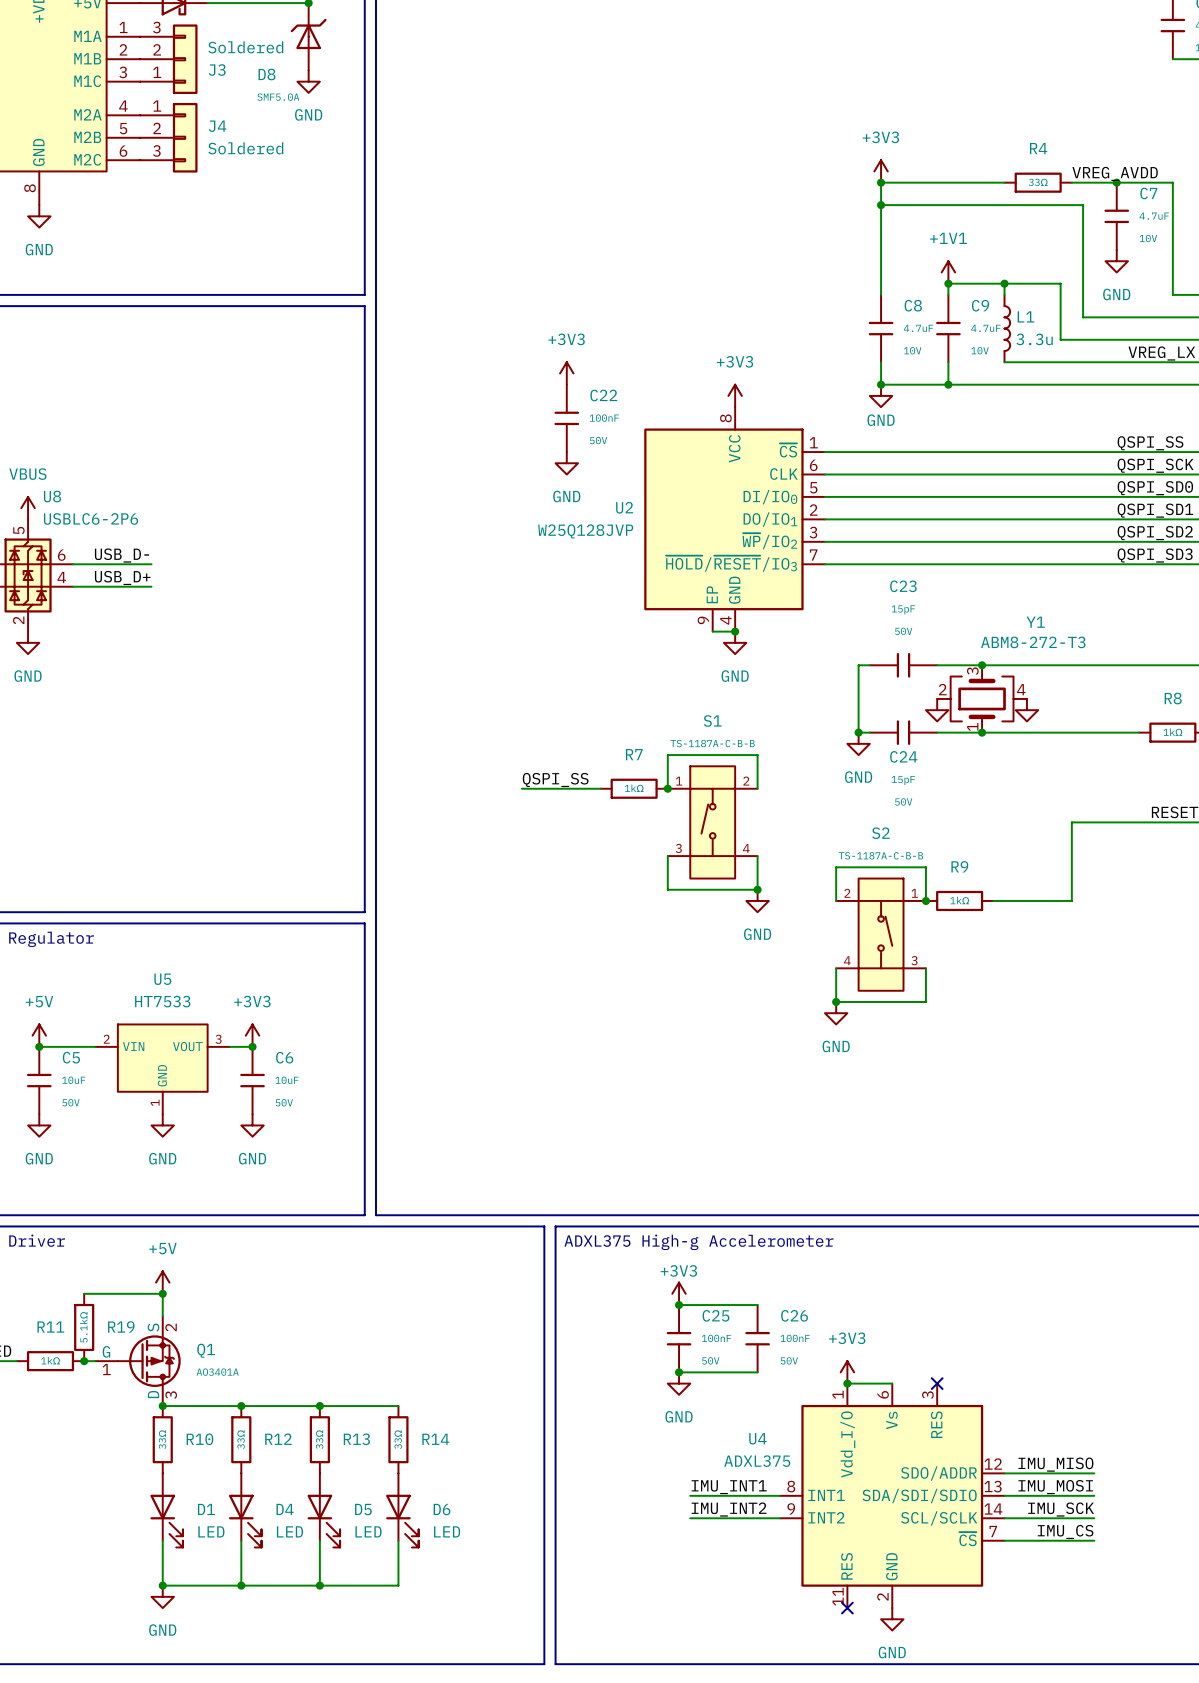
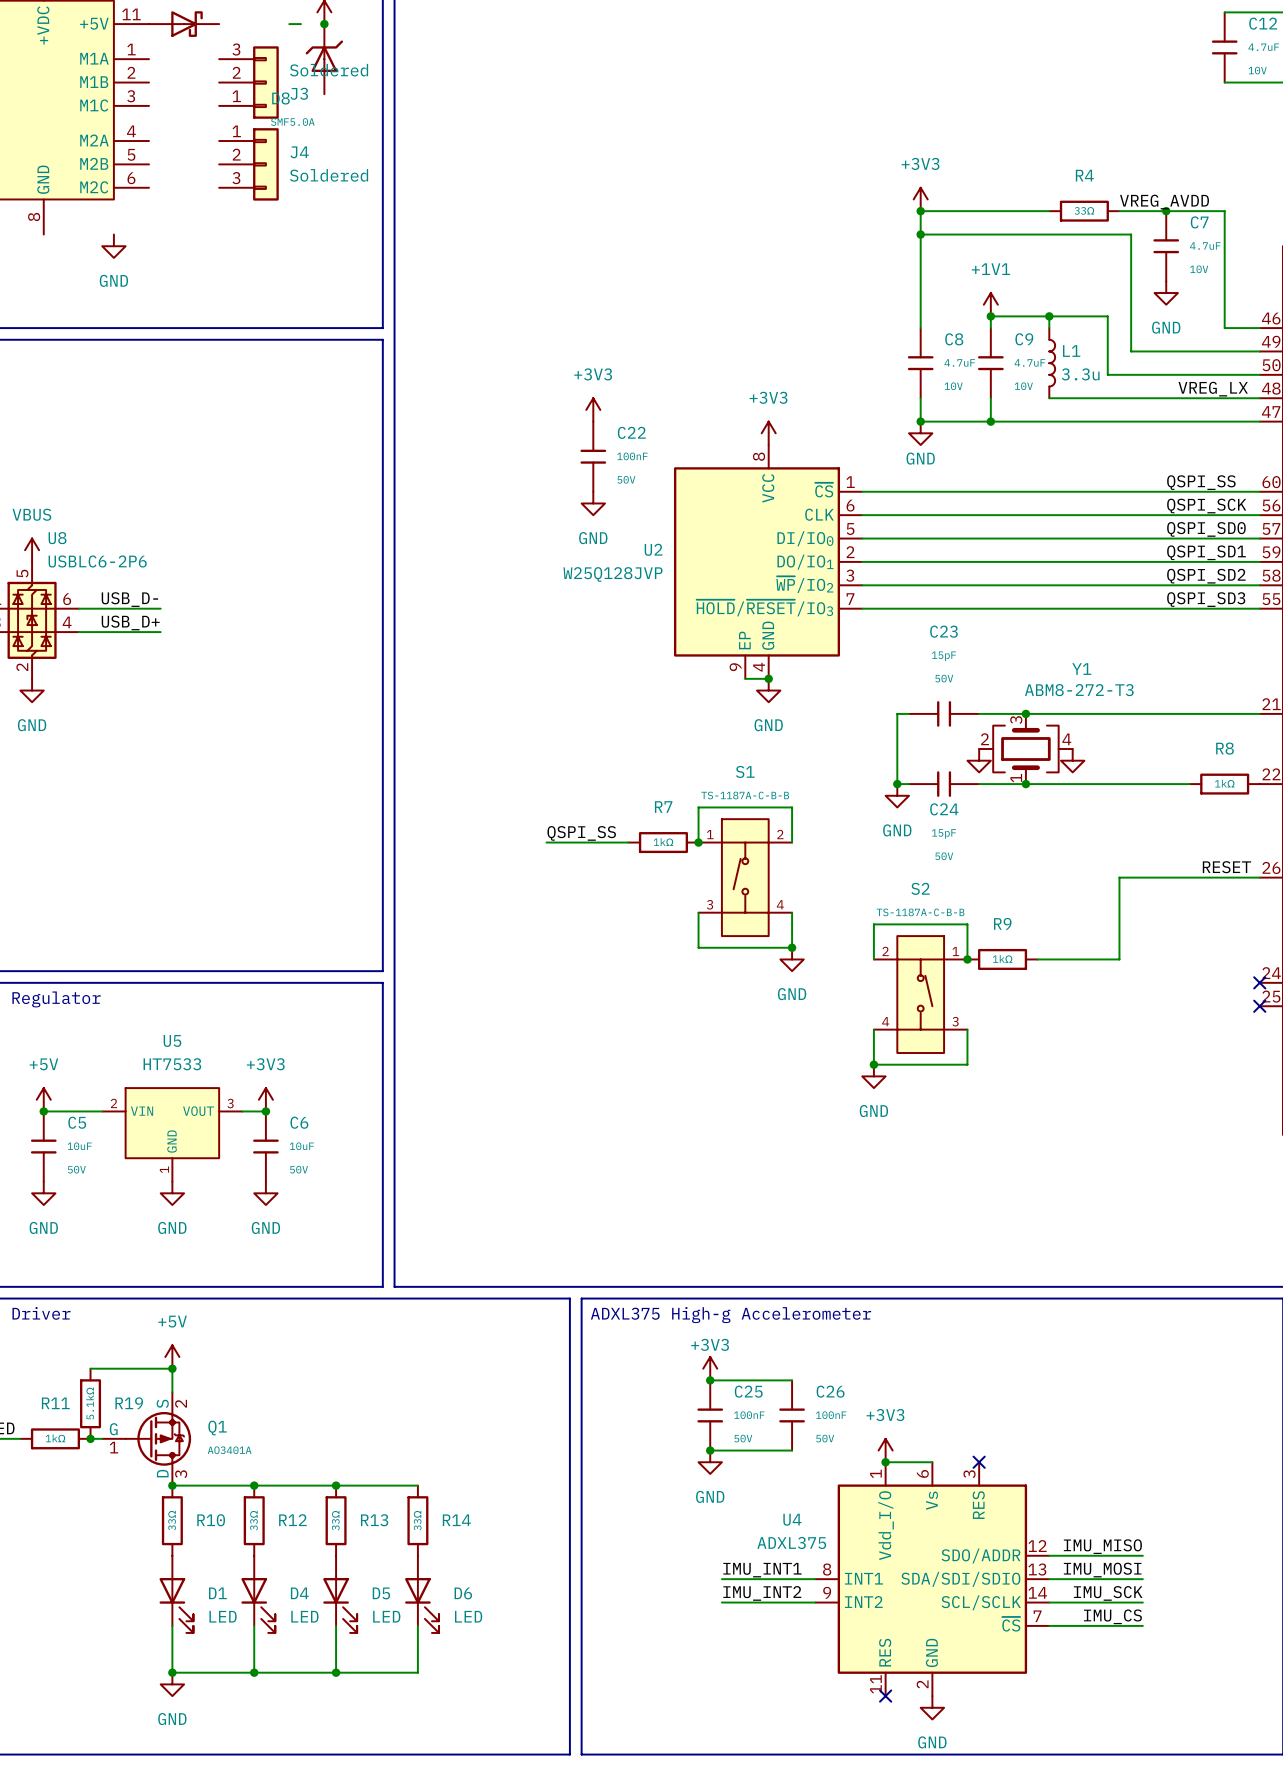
wire: (207, 3) (274, 3) -> none
wire: (286, 3) (308, 3) -> none
J3 position: (168, 59) -> (248, 82)
power symbol: GND (308, 81) -> none
J4 position: (168, 137) -> (248, 164)
power symbol position: GND (39, 216) -> GND (113, 246)

